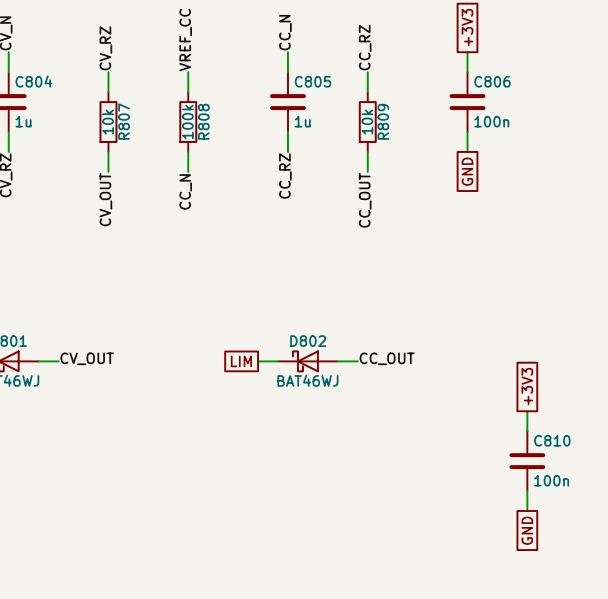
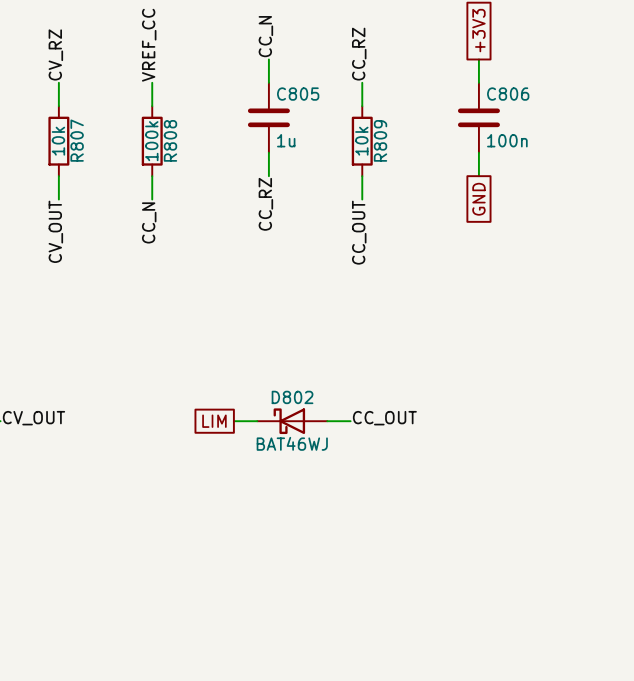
global label: +3V3 (527, 386) -> none
wire: (527, 411) (527, 431) -> none
C810: 100n (527, 461) -> none
wire: (527, 491) (527, 510) -> none
global label: GND (527, 530) -> none

